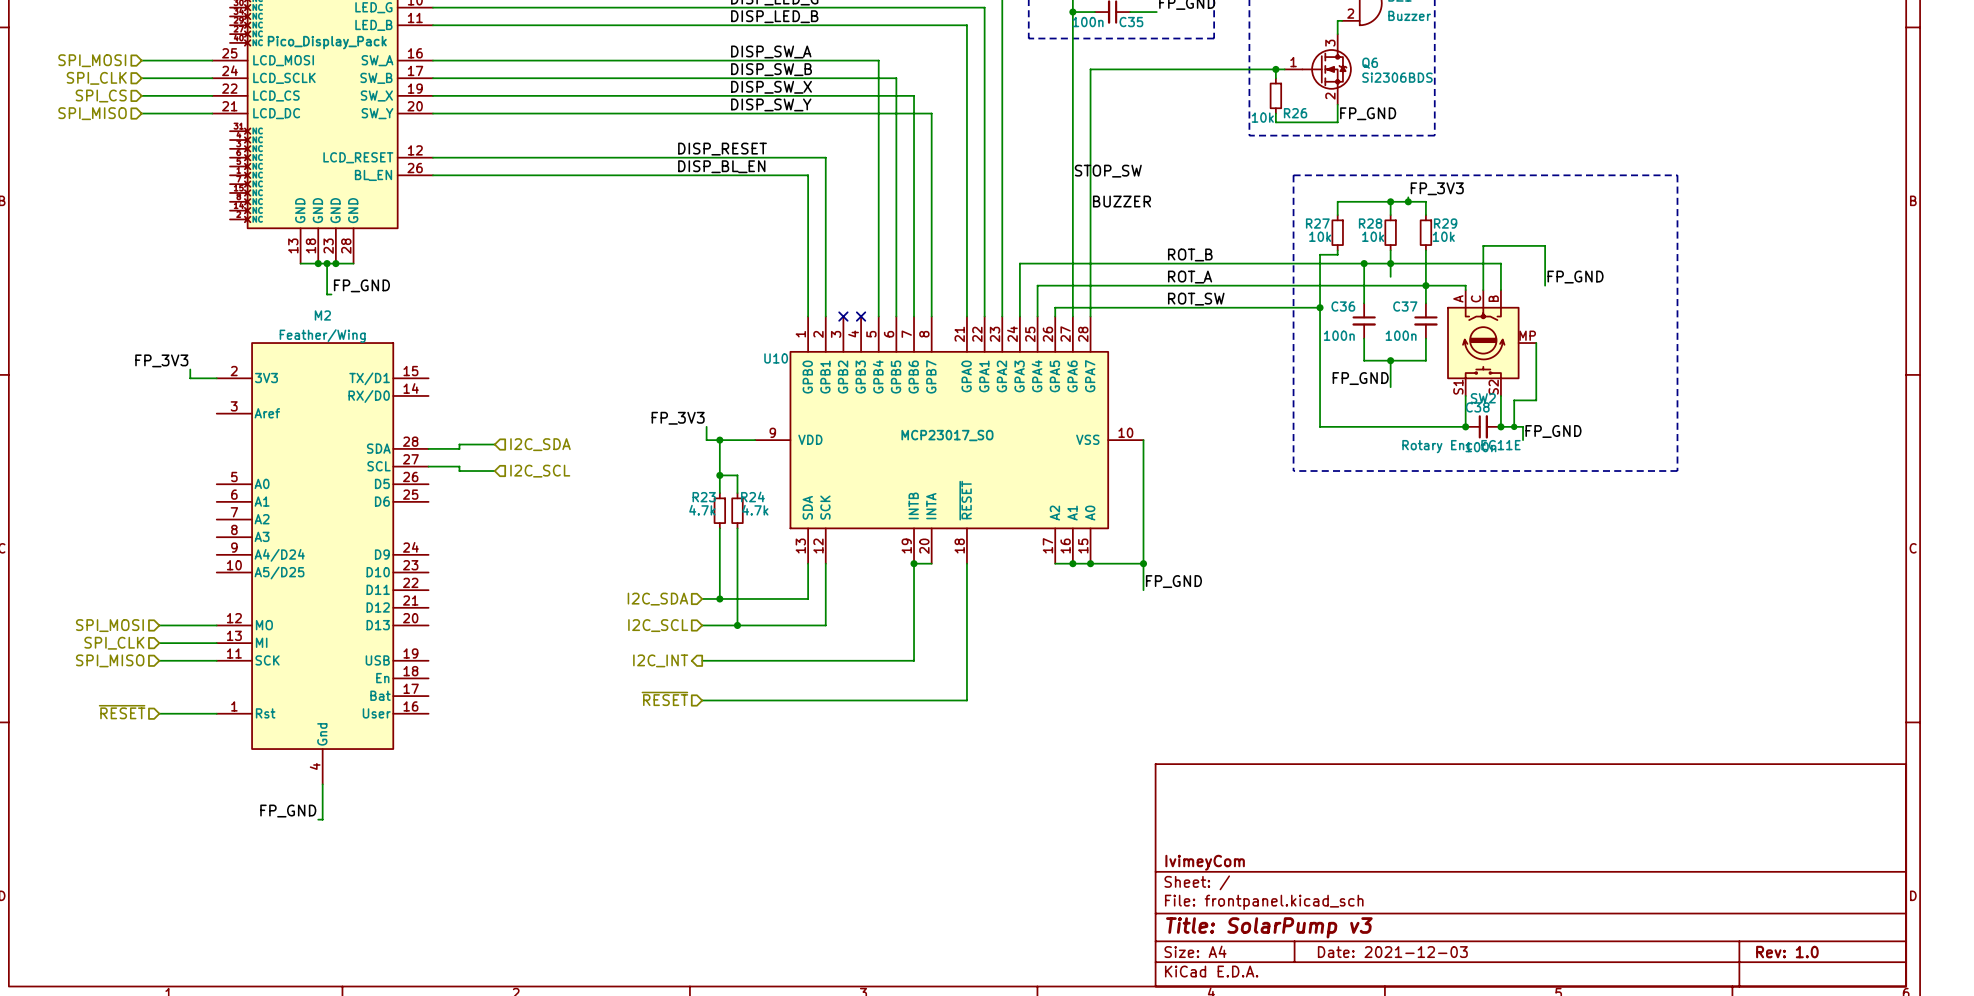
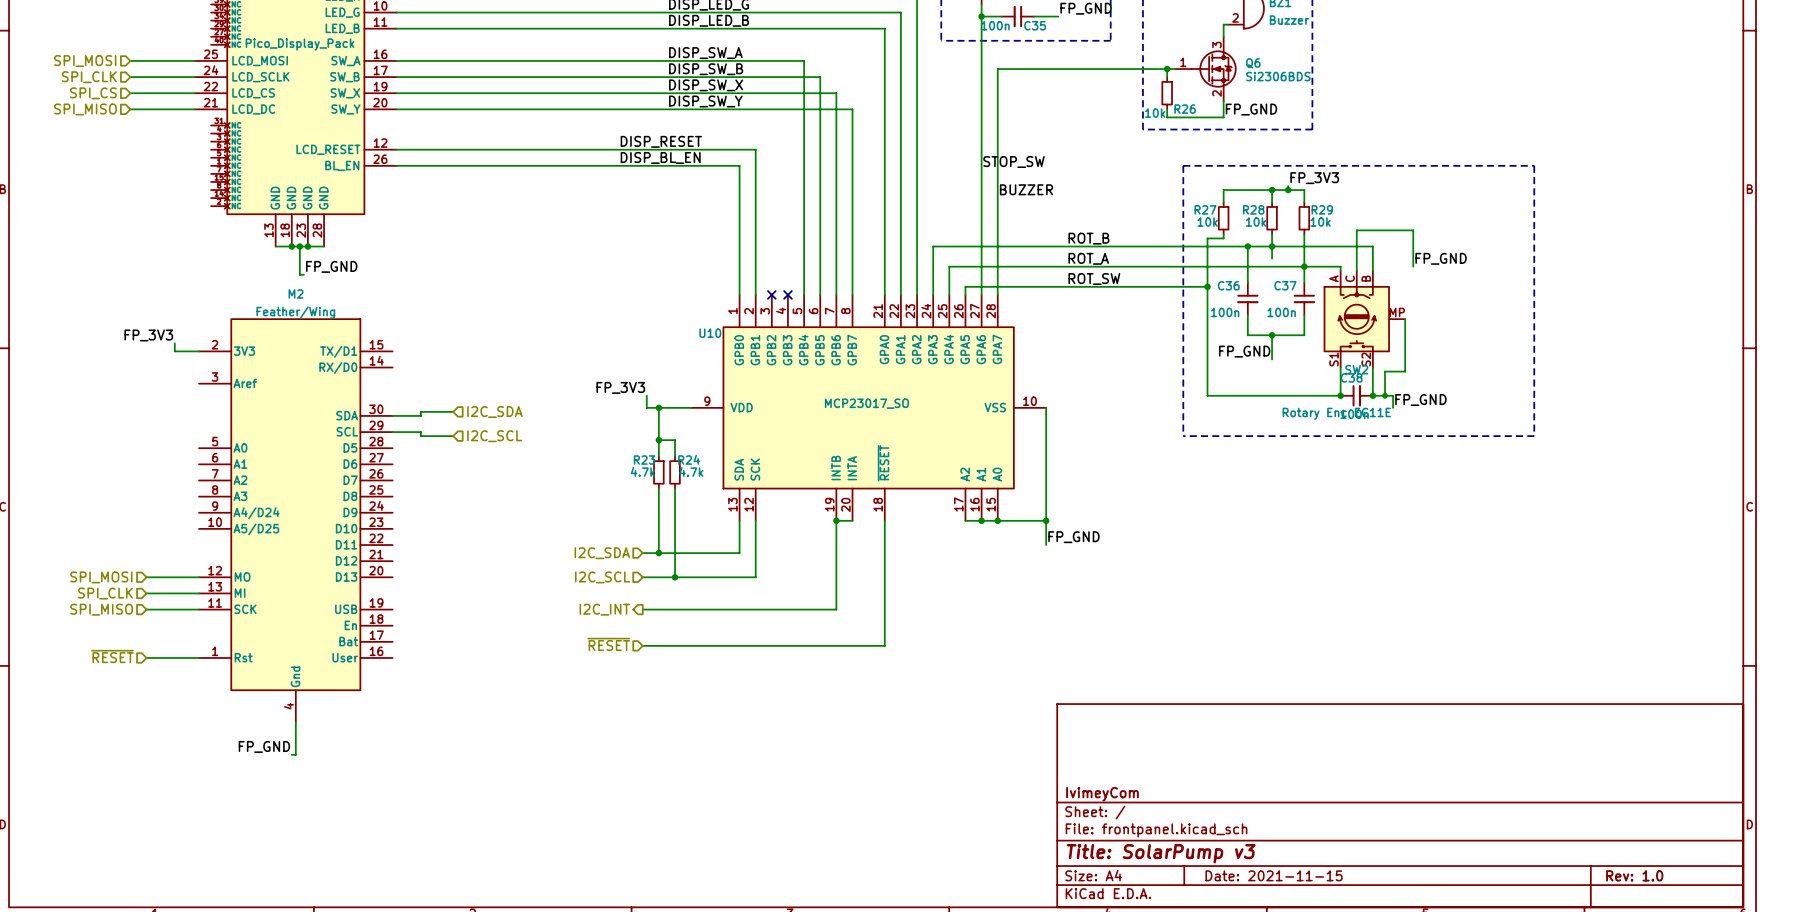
M2 symbol: [216, 342, 429, 785] -> [199, 318, 393, 723]
title block: Date: 2021-12-03 (1392, 952) -> Date: 2021-11-15 (1274, 875)

